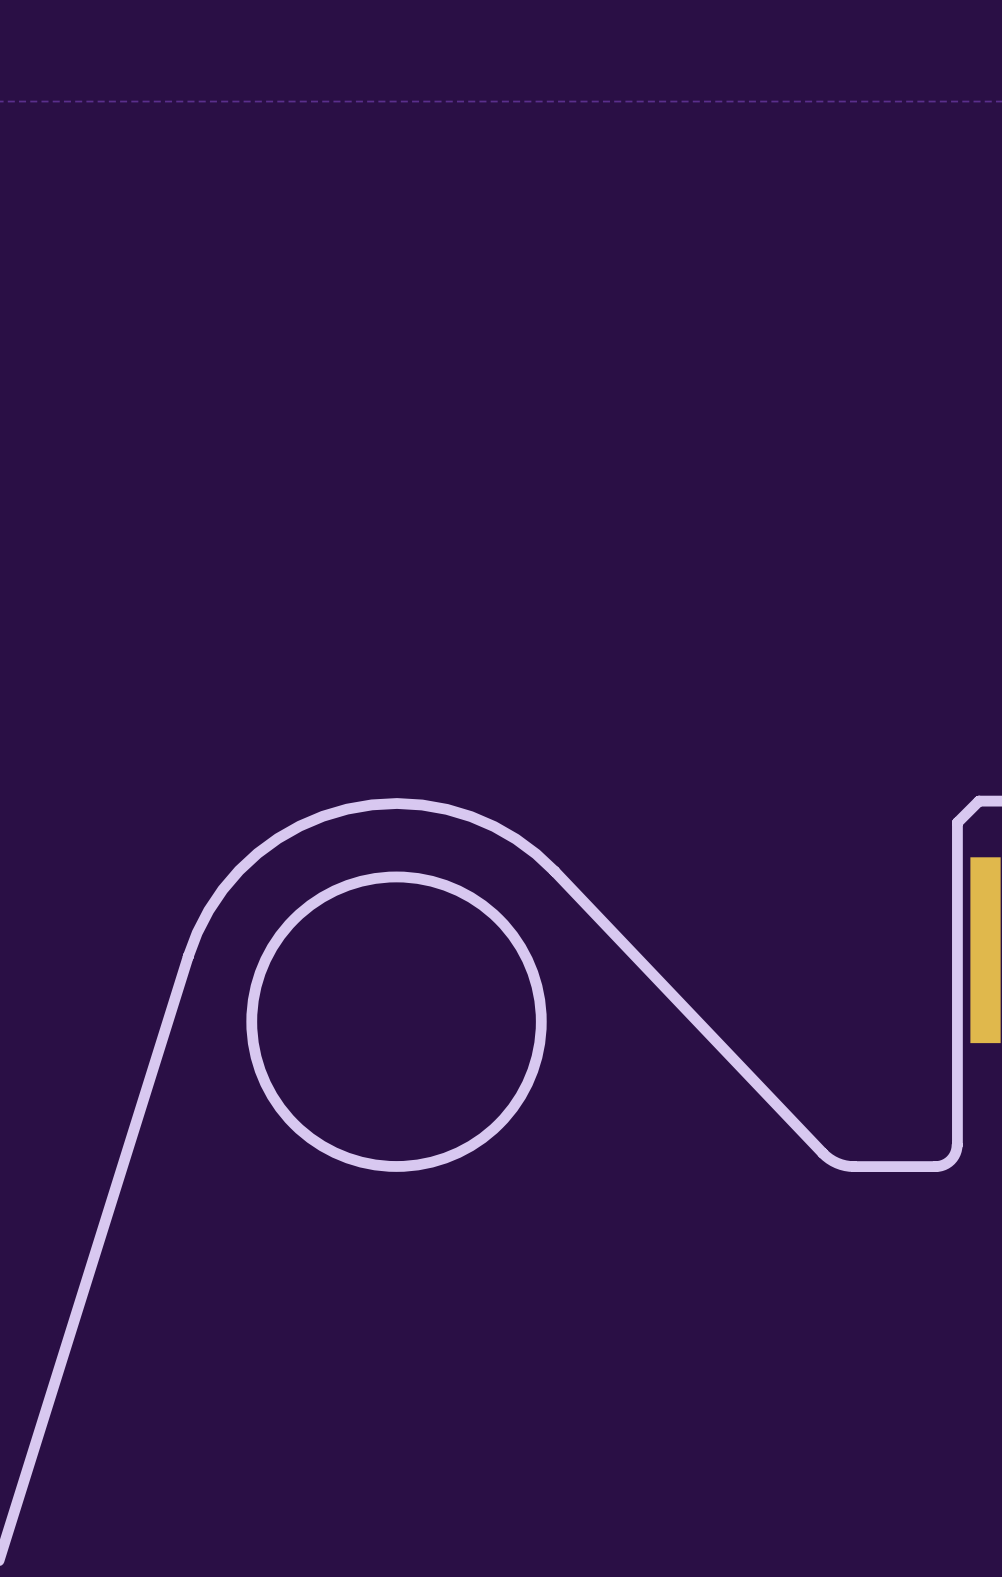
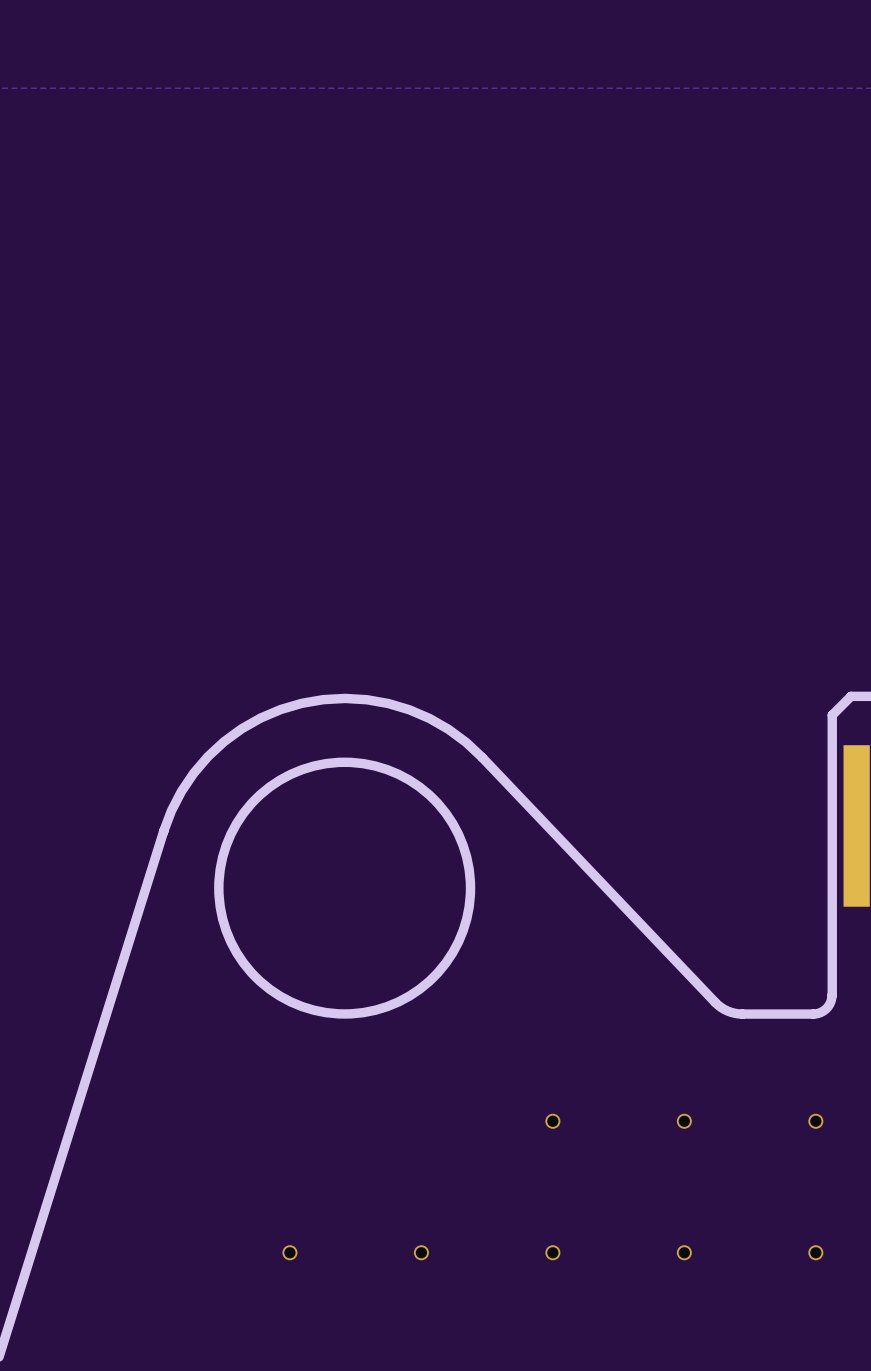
via: none -> (552, 1121)
via: none -> (684, 1121)
via: none -> (815, 1121)
via: none -> (289, 1252)
via: none -> (421, 1252)
via: none -> (552, 1252)
via: none -> (684, 1252)
via: none -> (815, 1252)

